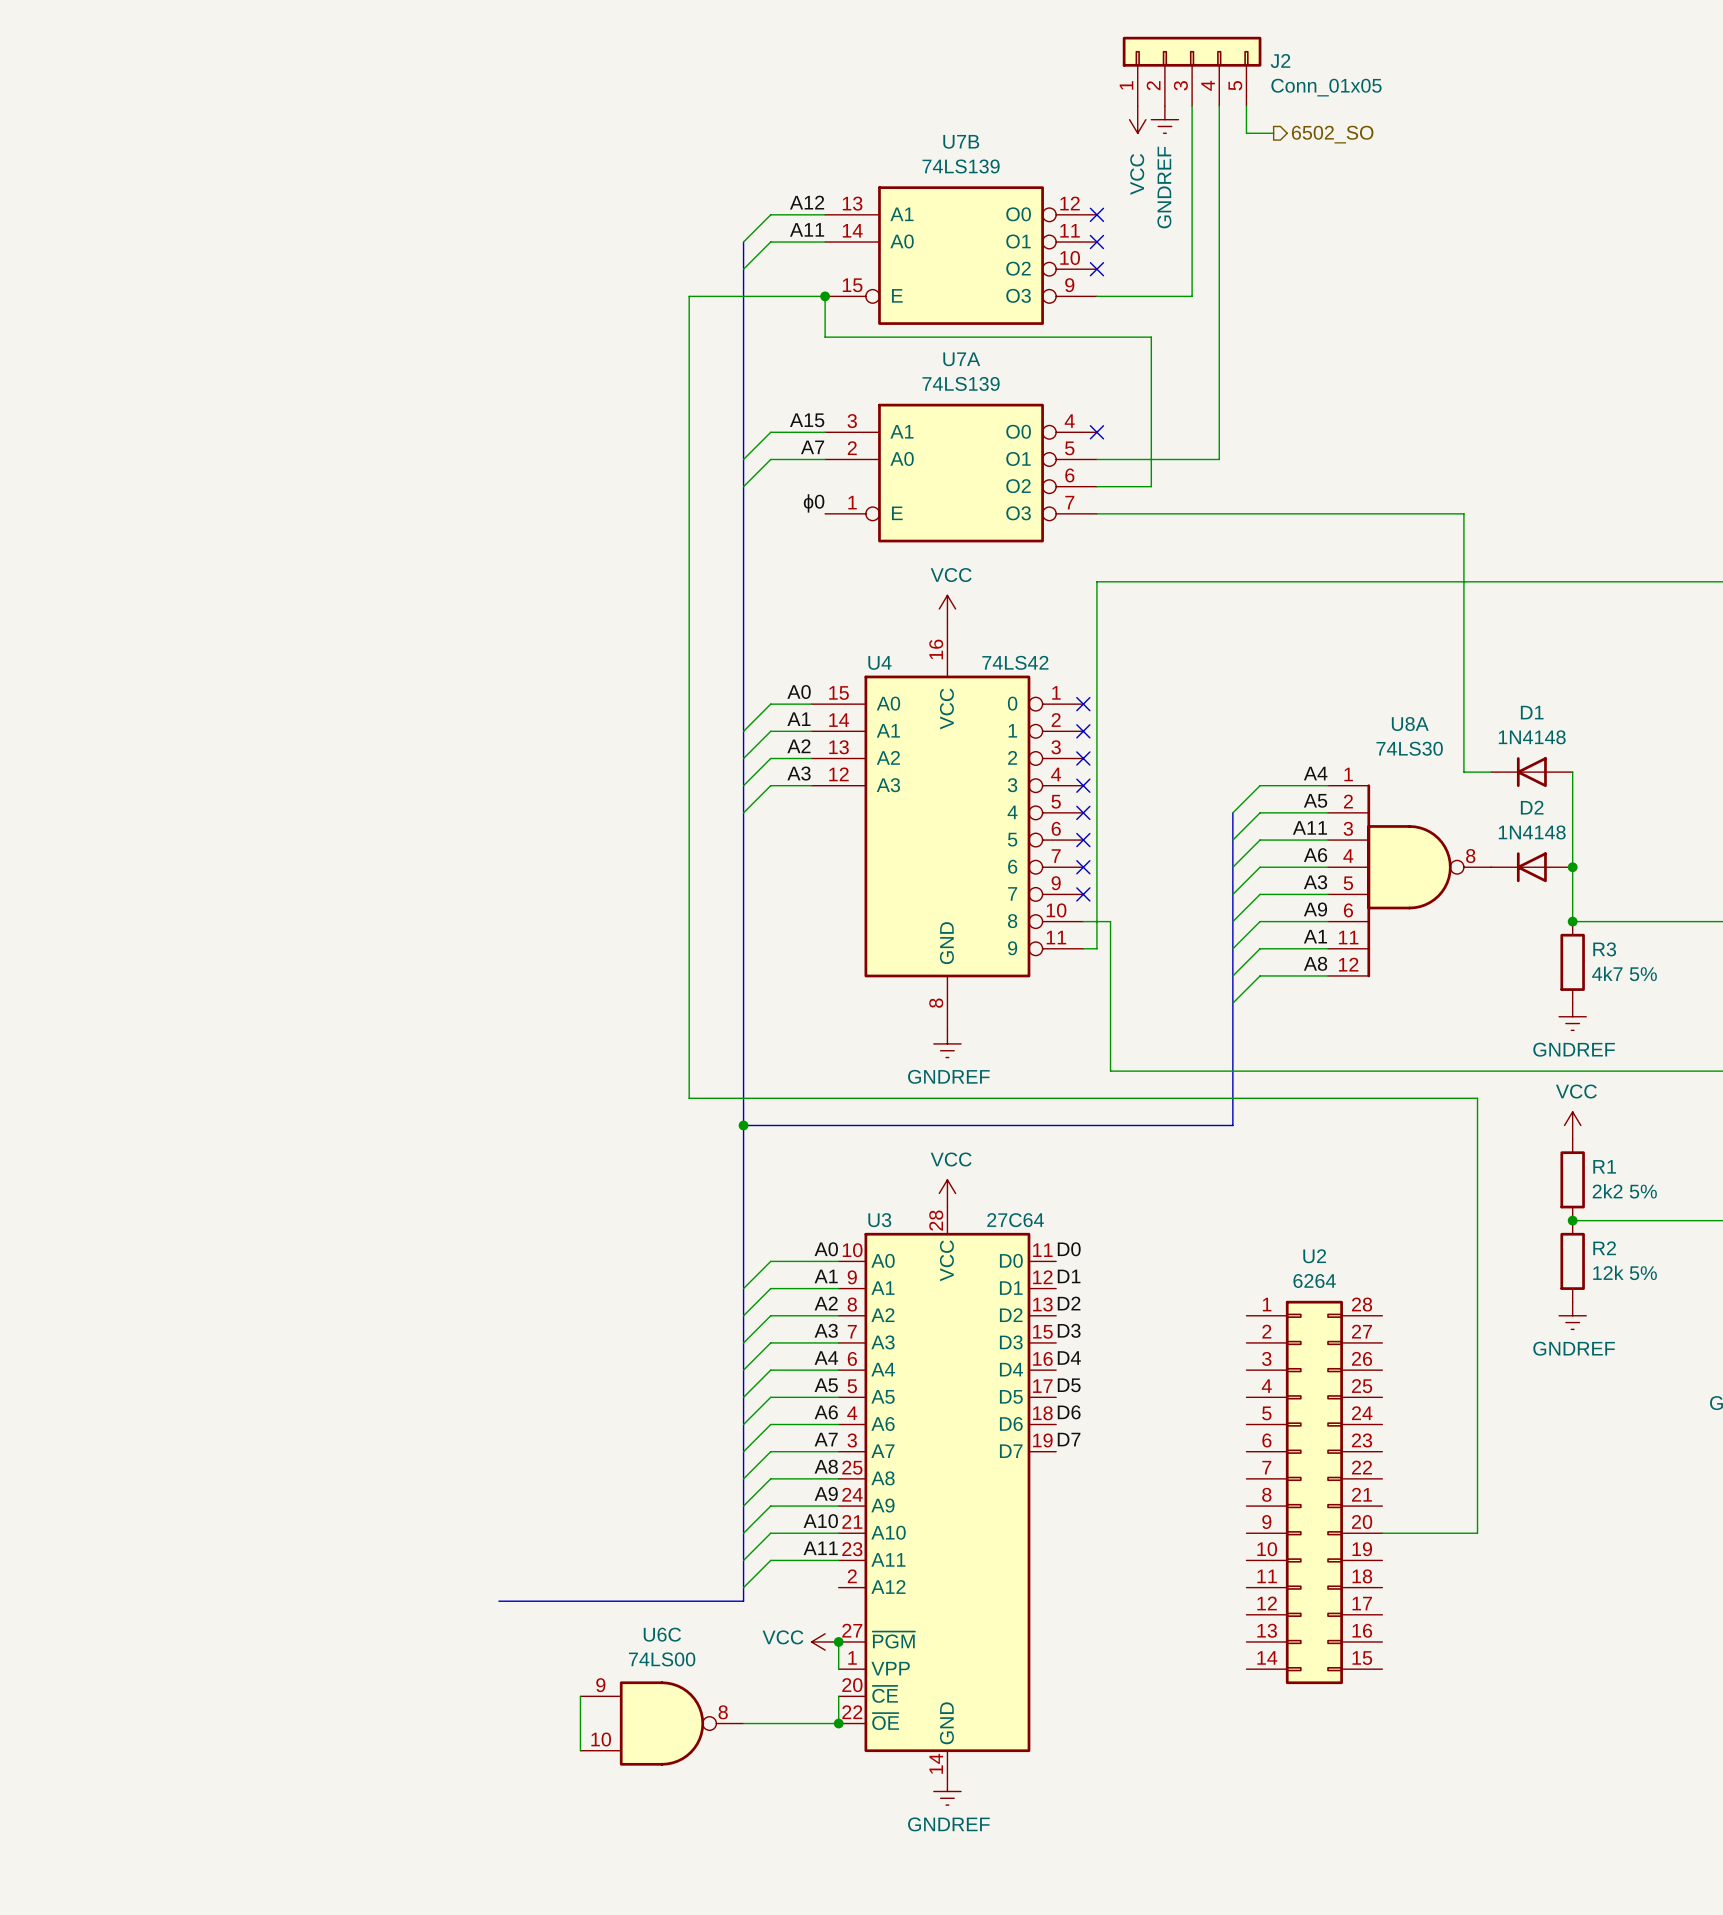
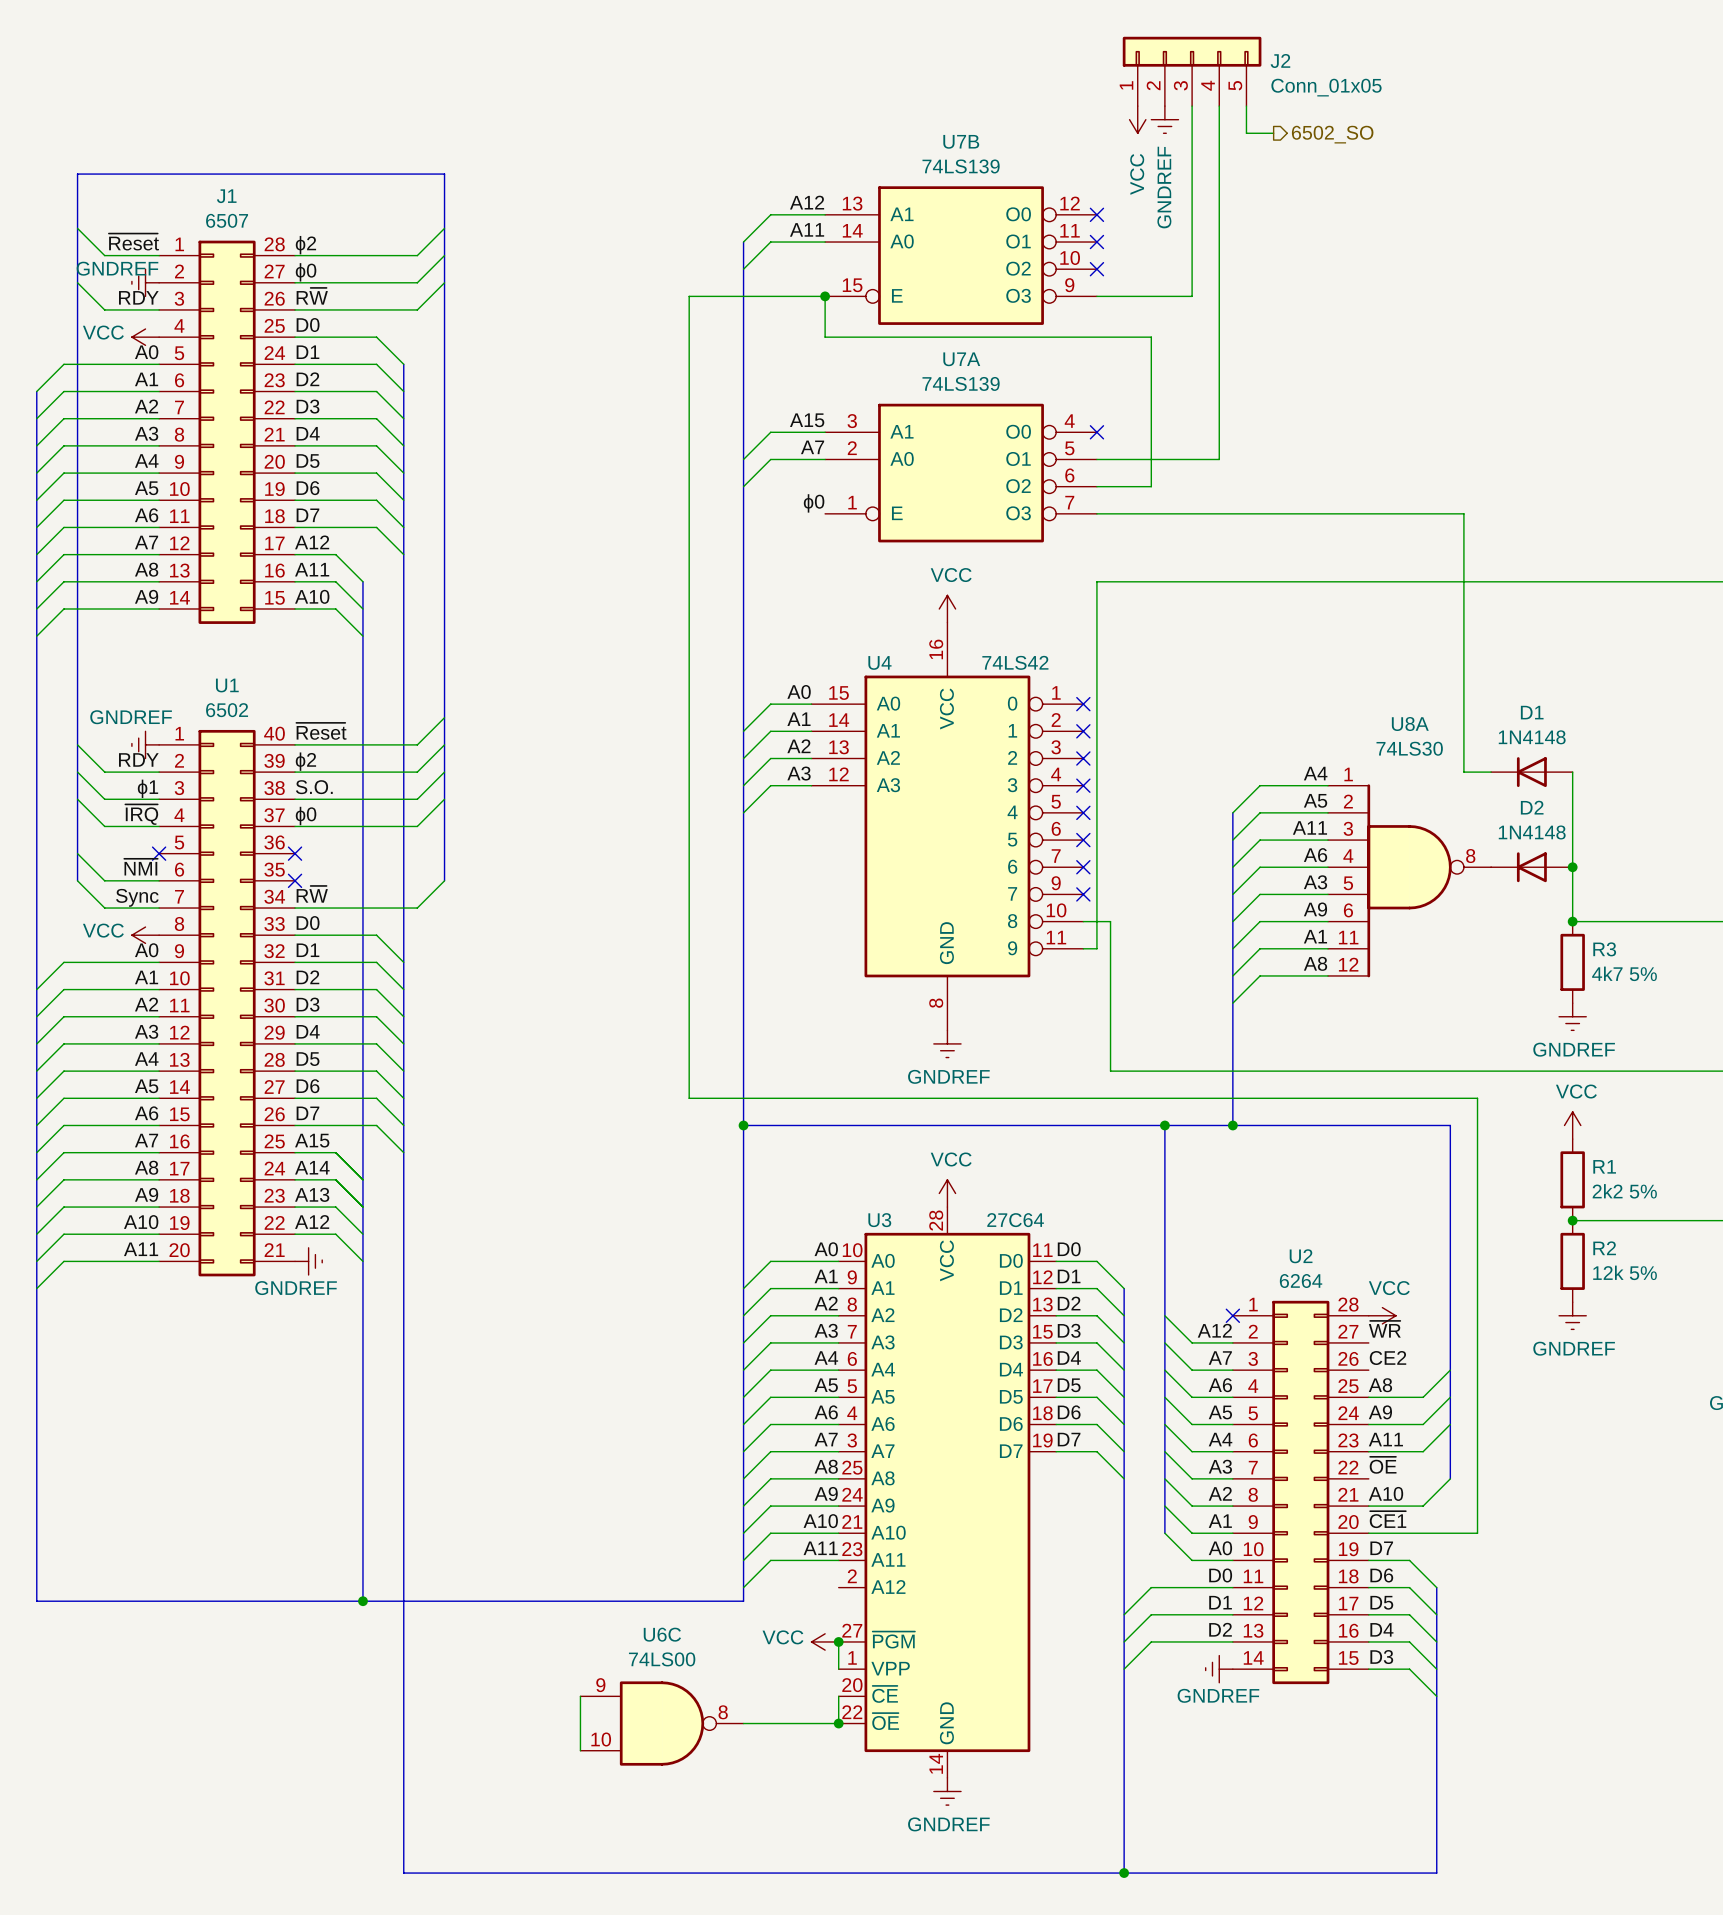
wire: none -> (77, 228) (104, 255) (159, 255)
wire: none -> (444, 228) (417, 255) (295, 255)
label: none -> ~{Reset} (133, 242)
label: none -> ϕ2 (305, 245)
wire: none -> (444, 255) (417, 282) (295, 282)
label: none -> ϕ0 (306, 272)
wire: none -> (77, 282) (104, 309) (159, 309)
power symbol: none -> GNDREF (145, 282)
wire: none -> (444, 282) (417, 309) (295, 309)
label: none -> R~{W} (312, 296)
label: none -> RDY (138, 297)
label: none -> D0 (308, 325)
power symbol: none -> VCC (145, 337)
wire: none -> (295, 337) (376, 337) (403, 364)
label: none -> A0 (146, 352)
label: none -> D1 (307, 352)
wire: none -> (159, 364) (63, 364) (36, 391)
wire: none -> (295, 364) (376, 364) (403, 391)
bus: none -> (403, 364) (403, 1873) (1436, 1873) (1436, 1587)
label: none -> A1 (146, 379)
label: none -> D2 (307, 379)
bus: none -> (36, 391) (36, 1601) (498, 1601)
wire: none -> (159, 391) (63, 391) (36, 418)
wire: none -> (295, 391) (376, 391) (403, 418)
label: none -> A2 (146, 406)
label: none -> D3 (308, 406)
wire: none -> (159, 418) (63, 418) (36, 445)
wire: none -> (295, 418) (376, 418) (403, 445)
J1: none -> 6507 (227, 432)
label: none -> A3 (146, 433)
label: none -> D4 (308, 433)
wire: none -> (159, 445) (63, 445) (36, 473)
wire: none -> (295, 445) (376, 445) (403, 473)
label: none -> A4 (146, 460)
label: none -> D5 (308, 461)
wire: none -> (159, 473) (63, 473) (36, 500)
wire: none -> (295, 473) (376, 473) (403, 500)
label: none -> A5 (146, 488)
label: none -> D6 (308, 488)
wire: none -> (159, 500) (63, 500) (36, 527)
wire: none -> (295, 500) (376, 500) (403, 527)
label: none -> A6 (146, 515)
label: none -> D7 (307, 515)
wire: none -> (159, 527) (63, 527) (36, 554)
wire: none -> (295, 527) (376, 527) (403, 554)
label: none -> A7 (146, 542)
label: none -> A12 (312, 542)
wire: none -> (159, 554) (63, 554) (36, 581)
wire: none -> (295, 554) (335, 554) (362, 581)
label: none -> A8 (146, 569)
label: none -> A11 (312, 569)
wire: none -> (159, 581) (63, 581) (36, 608)
wire: none -> (295, 581) (335, 581) (362, 608)
bus: none -> (362, 581) (362, 1601)
label: none -> A9 (146, 596)
label: none -> A10 (312, 596)
wire: none -> (159, 608) (63, 608) (36, 636)
wire: none -> (295, 608) (335, 608) (362, 636)
wire: none -> (444, 717) (417, 744) (295, 744)
label: none -> ~{Reset} (321, 731)
wire: none -> (77, 744) (104, 772) (159, 772)
power symbol: none -> GNDREF (145, 744)
wire: none -> (444, 744) (417, 772) (295, 772)
label: none -> RDY (138, 759)
label: none -> ϕ2 (305, 761)
wire: none -> (77, 772) (104, 799) (159, 799)
wire: none -> (444, 772) (417, 799) (295, 799)
label: none -> S.O. (314, 787)
label: none -> ϕ1 (147, 788)
wire: none -> (77, 799) (104, 826) (159, 826)
wire: none -> (444, 799) (417, 826) (295, 826)
label: none -> ~{IRQ} (141, 814)
label: none -> ϕ0 (306, 816)
wire: none -> (77, 853) (104, 880) (159, 880)
no-connect mark: none -> (159, 853)
no-connect mark: none -> (295, 853)
label: none -> ~{NMI} (140, 867)
wire: none -> (77, 880) (104, 908) (159, 908)
bus: none -> (77, 880) (77, 174) (444, 174) (444, 880)
no-connect mark: none -> (295, 880)
wire: none -> (444, 880) (417, 908) (295, 908)
label: none -> R~{W} (312, 894)
label: none -> Sync (137, 897)
label: none -> D0 (308, 923)
power symbol: none -> VCC (145, 935)
wire: none -> (295, 935) (376, 935) (403, 962)
label: none -> A0 (146, 950)
label: none -> D1 (307, 950)
wire: none -> (159, 962) (63, 962) (36, 989)
wire: none -> (295, 962) (376, 962) (403, 989)
label: none -> A1 (146, 977)
label: none -> D2 (307, 977)
wire: none -> (159, 989) (63, 989) (36, 1016)
wire: none -> (295, 989) (376, 989) (403, 1016)
U1: none -> 6502 (227, 1003)
label: none -> A2 (146, 1004)
label: none -> D3 (308, 1004)
wire: none -> (159, 1016) (63, 1016) (36, 1043)
wire: none -> (295, 1016) (376, 1016) (403, 1043)
label: none -> A3 (146, 1031)
label: none -> D4 (308, 1031)
wire: none -> (159, 1043) (63, 1043) (36, 1071)
wire: none -> (295, 1043) (376, 1043) (403, 1071)
label: none -> A4 (146, 1058)
label: none -> D5 (308, 1059)
wire: none -> (159, 1071) (63, 1071) (36, 1098)
wire: none -> (295, 1071) (376, 1071) (403, 1098)
label: none -> A5 (146, 1086)
label: none -> D6 (308, 1086)
wire: none -> (159, 1098) (63, 1098) (36, 1125)
wire: none -> (295, 1098) (376, 1098) (403, 1125)
label: none -> A6 (146, 1113)
label: none -> D7 (307, 1113)
wire: none -> (159, 1125) (63, 1125) (36, 1152)
wire: none -> (295, 1125) (376, 1125) (403, 1152)
bus: none -> (1164, 1125) (1164, 1533)
junction: none -> (1164, 1125)
bus: none -> (1232, 1125) (1450, 1125) (1450, 1478)
junction: none -> (1232, 1125)
label: none -> A7 (146, 1140)
label: none -> A15 (312, 1140)
wire: none -> (159, 1152) (63, 1152) (36, 1179)
wire: none -> (295, 1152) (335, 1152) (362, 1179)
label: none -> A8 (146, 1167)
label: none -> A14 (312, 1167)
wire: none -> (159, 1179) (63, 1179) (36, 1207)
wire: none -> (295, 1179) (335, 1179) (362, 1207)
label: none -> A9 (146, 1194)
label: none -> A13 (312, 1194)
wire: none -> (159, 1207) (63, 1207) (36, 1234)
wire: none -> (295, 1207) (335, 1207) (362, 1234)
label: none -> A12 (312, 1221)
label: none -> A10 (141, 1222)
wire: none -> (159, 1234) (63, 1234) (36, 1261)
wire: none -> (295, 1234) (335, 1234) (362, 1261)
label: none -> A11 (141, 1249)
wire: none -> (159, 1261) (63, 1261) (36, 1288)
power symbol: none -> GNDREF (308, 1261)
wire: none -> (1056, 1261) (1096, 1261) (1124, 1288)
wire: none -> (1056, 1288) (1096, 1288) (1124, 1315)
bus: none -> (1124, 1288) (1124, 1873)
wire: none -> (1056, 1315) (1096, 1315) (1124, 1342)
wire: none -> (1164, 1315) (1192, 1342) (1232, 1342)
no-connect mark: none -> (1232, 1315)
power symbol: none -> VCC (1382, 1315)
label: none -> ~{WR} (1384, 1329)
label: none -> A12 (1214, 1330)
wire: none -> (1056, 1342) (1096, 1342) (1124, 1370)
wire: none -> (1164, 1342) (1192, 1370) (1232, 1370)
label: none -> A7 (1220, 1358)
label: none -> CE2 (1388, 1358)
wire: none -> (1056, 1370) (1096, 1370) (1124, 1397)
wire: none -> (1164, 1370) (1192, 1397) (1232, 1397)
wire: none -> (1450, 1370) (1423, 1397) (1368, 1397)
label: none -> A6 (1220, 1385)
label: none -> A8 (1380, 1385)
wire: none -> (1056, 1397) (1096, 1397) (1124, 1424)
wire: none -> (1164, 1397) (1192, 1424) (1232, 1424)
wire: none -> (1450, 1397) (1423, 1424) (1368, 1424)
label: none -> A5 (1220, 1412)
label: none -> A9 (1380, 1412)
wire: none -> (1056, 1424) (1096, 1424) (1124, 1451)
wire: none -> (1164, 1424) (1192, 1451) (1232, 1451)
wire: none -> (1450, 1424) (1423, 1451) (1368, 1451)
label: none -> A4 (1220, 1439)
label: none -> A11 (1385, 1439)
wire: none -> (1056, 1451) (1096, 1451) (1124, 1478)
wire: none -> (1164, 1451) (1192, 1478) (1232, 1478)
label: none -> ~{OE} (1383, 1465)
label: none -> A3 (1220, 1466)
wire: none -> (1164, 1478) (1192, 1506) (1232, 1506)
wire: none -> (1450, 1478) (1423, 1506) (1368, 1506)
U2 position: (1314, 1492) -> (1300, 1492)
label: none -> A2 (1220, 1493)
label: none -> A10 (1385, 1493)
wire: none -> (1164, 1506) (1192, 1533) (1232, 1533)
label: none -> ~{CE1} (1388, 1519)
label: none -> A1 (1220, 1521)
wire: none -> (1164, 1533) (1192, 1560) (1232, 1560)
label: none -> A0 (1220, 1548)
label: none -> D7 (1381, 1548)
wire: none -> (1368, 1560) (1409, 1560) (1436, 1587)
label: none -> D0 (1220, 1575)
label: none -> D6 (1381, 1575)
wire: none -> (1232, 1587) (1151, 1587) (1124, 1614)
wire: none -> (1368, 1587) (1409, 1587) (1436, 1614)
junction: none -> (362, 1601)
label: none -> D1 (1220, 1602)
label: none -> D5 (1381, 1602)
wire: none -> (1232, 1614) (1151, 1614) (1124, 1641)
wire: none -> (1368, 1614) (1409, 1614) (1436, 1641)
label: none -> D2 (1220, 1629)
label: none -> D4 (1381, 1629)
wire: none -> (1232, 1641) (1151, 1641) (1124, 1669)
wire: none -> (1368, 1641) (1409, 1641) (1436, 1669)
label: none -> D3 (1381, 1657)
power symbol: none -> GNDREF (1219, 1669)
wire: none -> (1368, 1669) (1409, 1669) (1436, 1696)
junction: none -> (1124, 1873)

